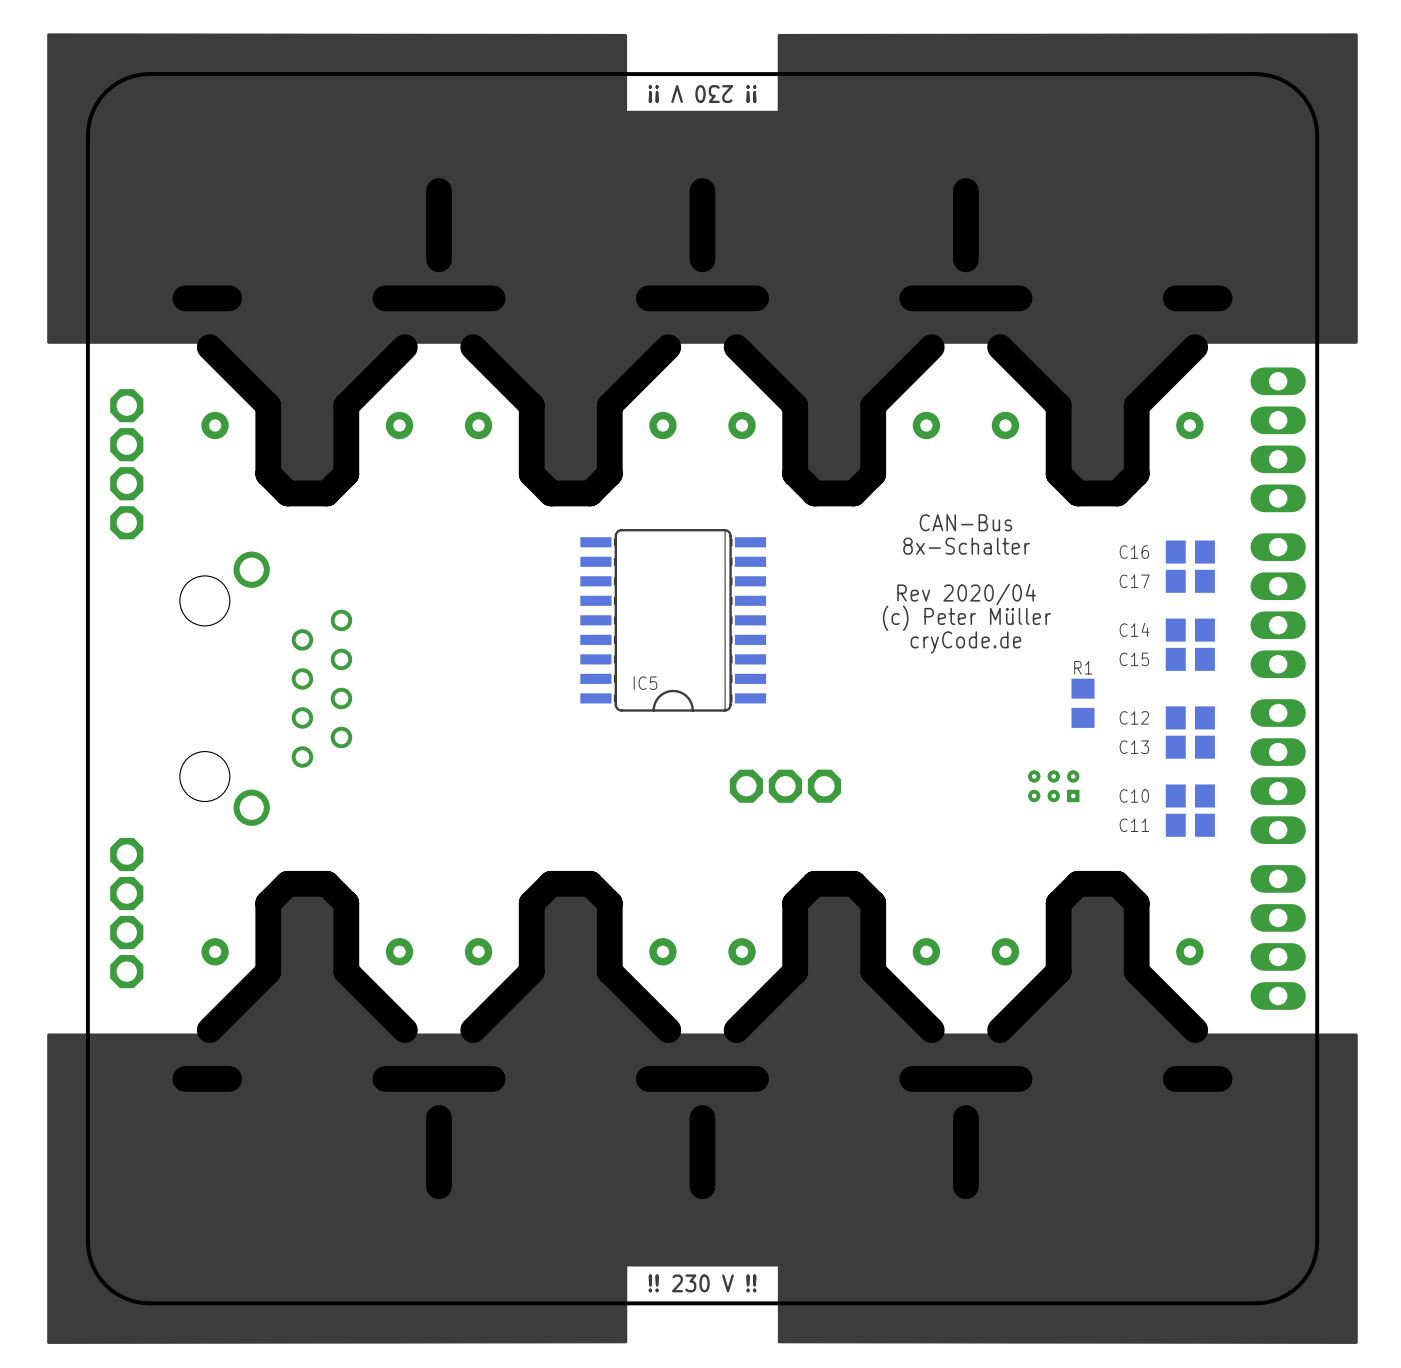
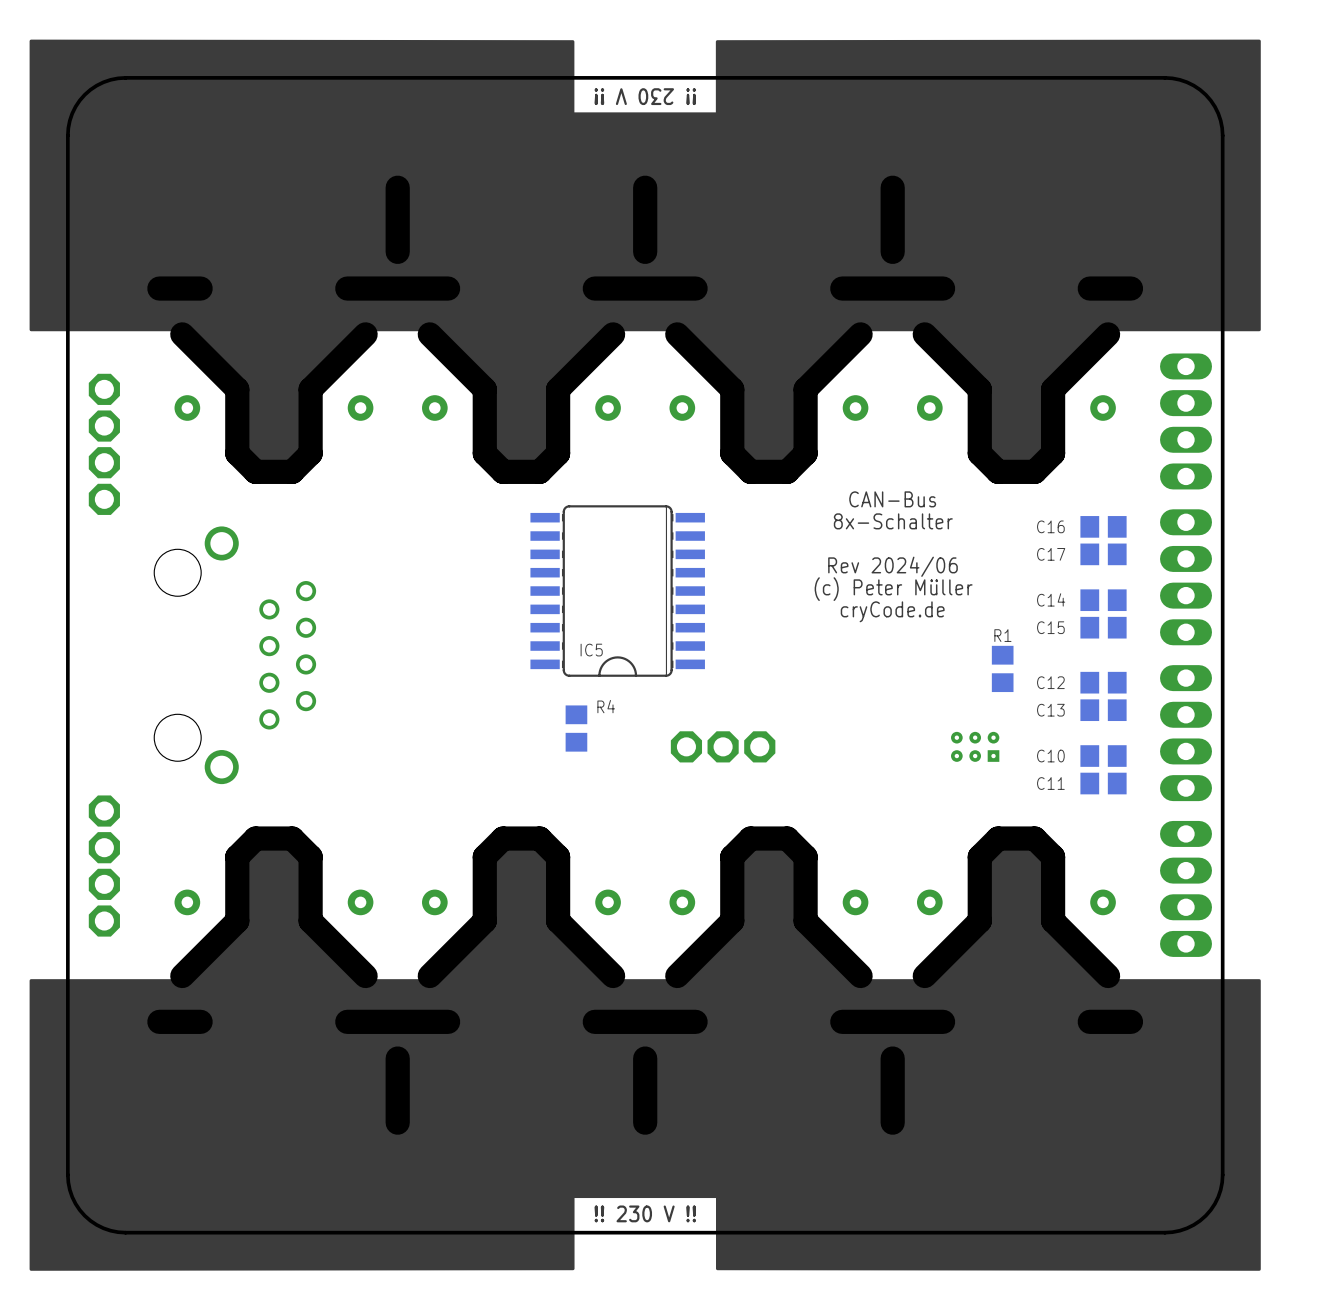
text: Rev 2020/04 (966, 594) -> Rev 2024/06 (893, 566)
R4: none -> (576, 728)

